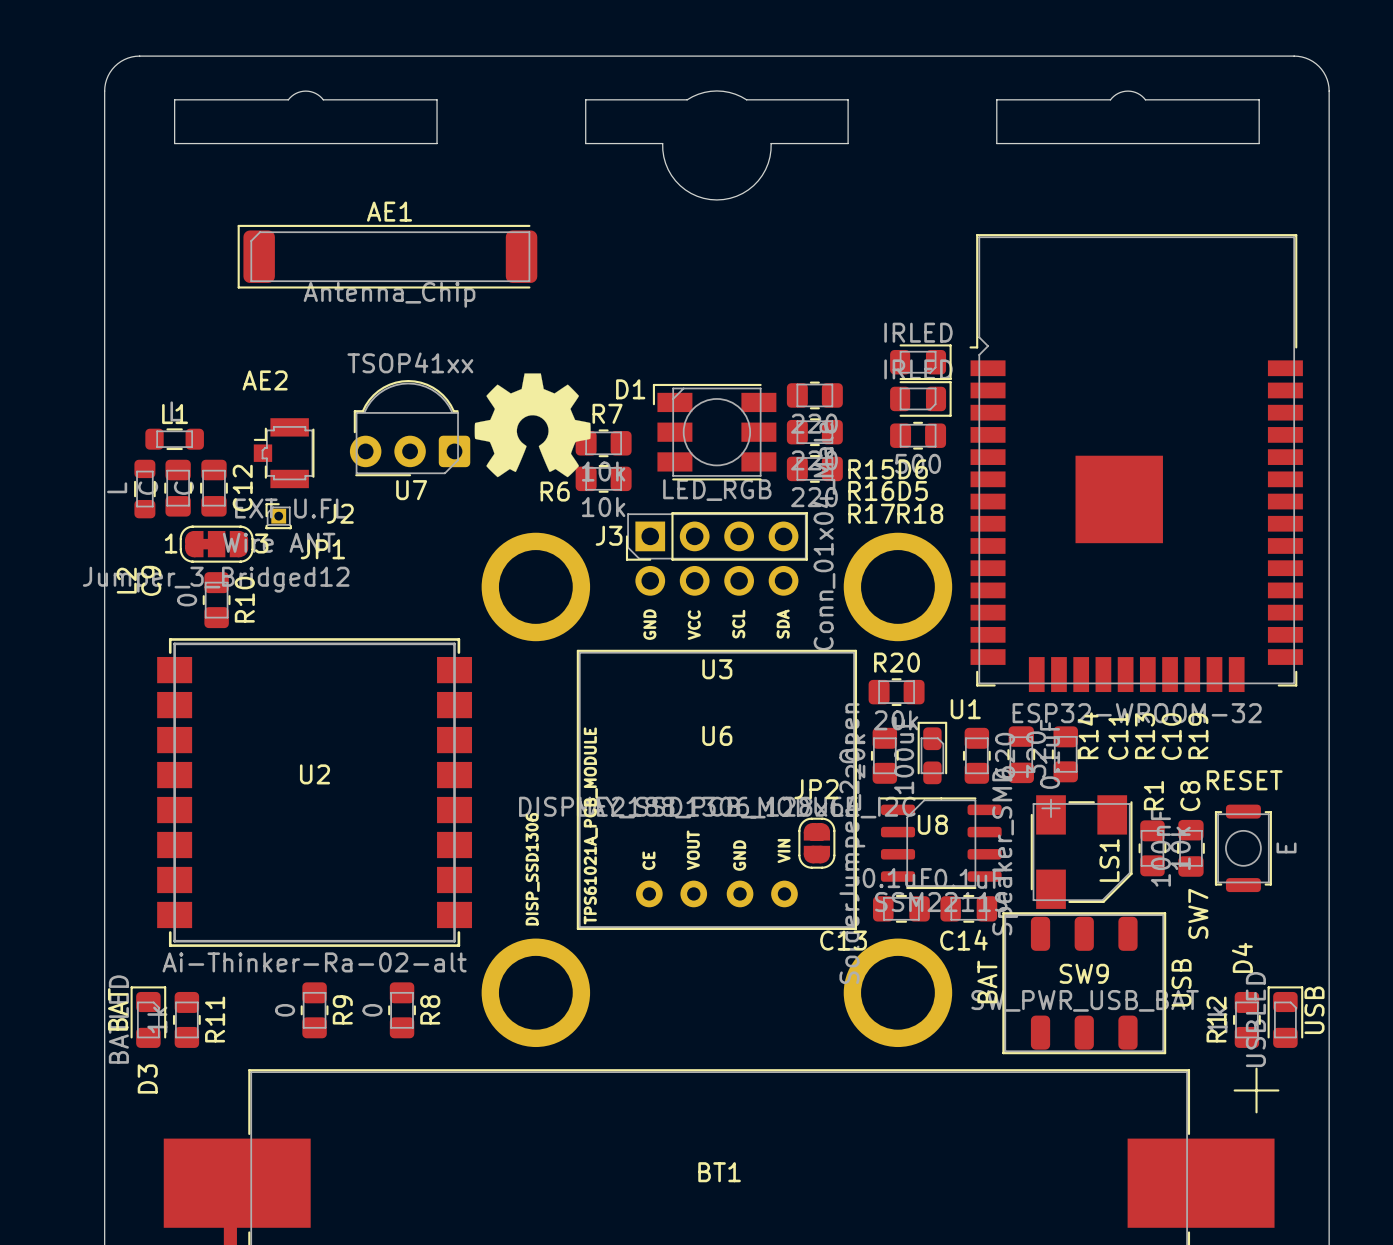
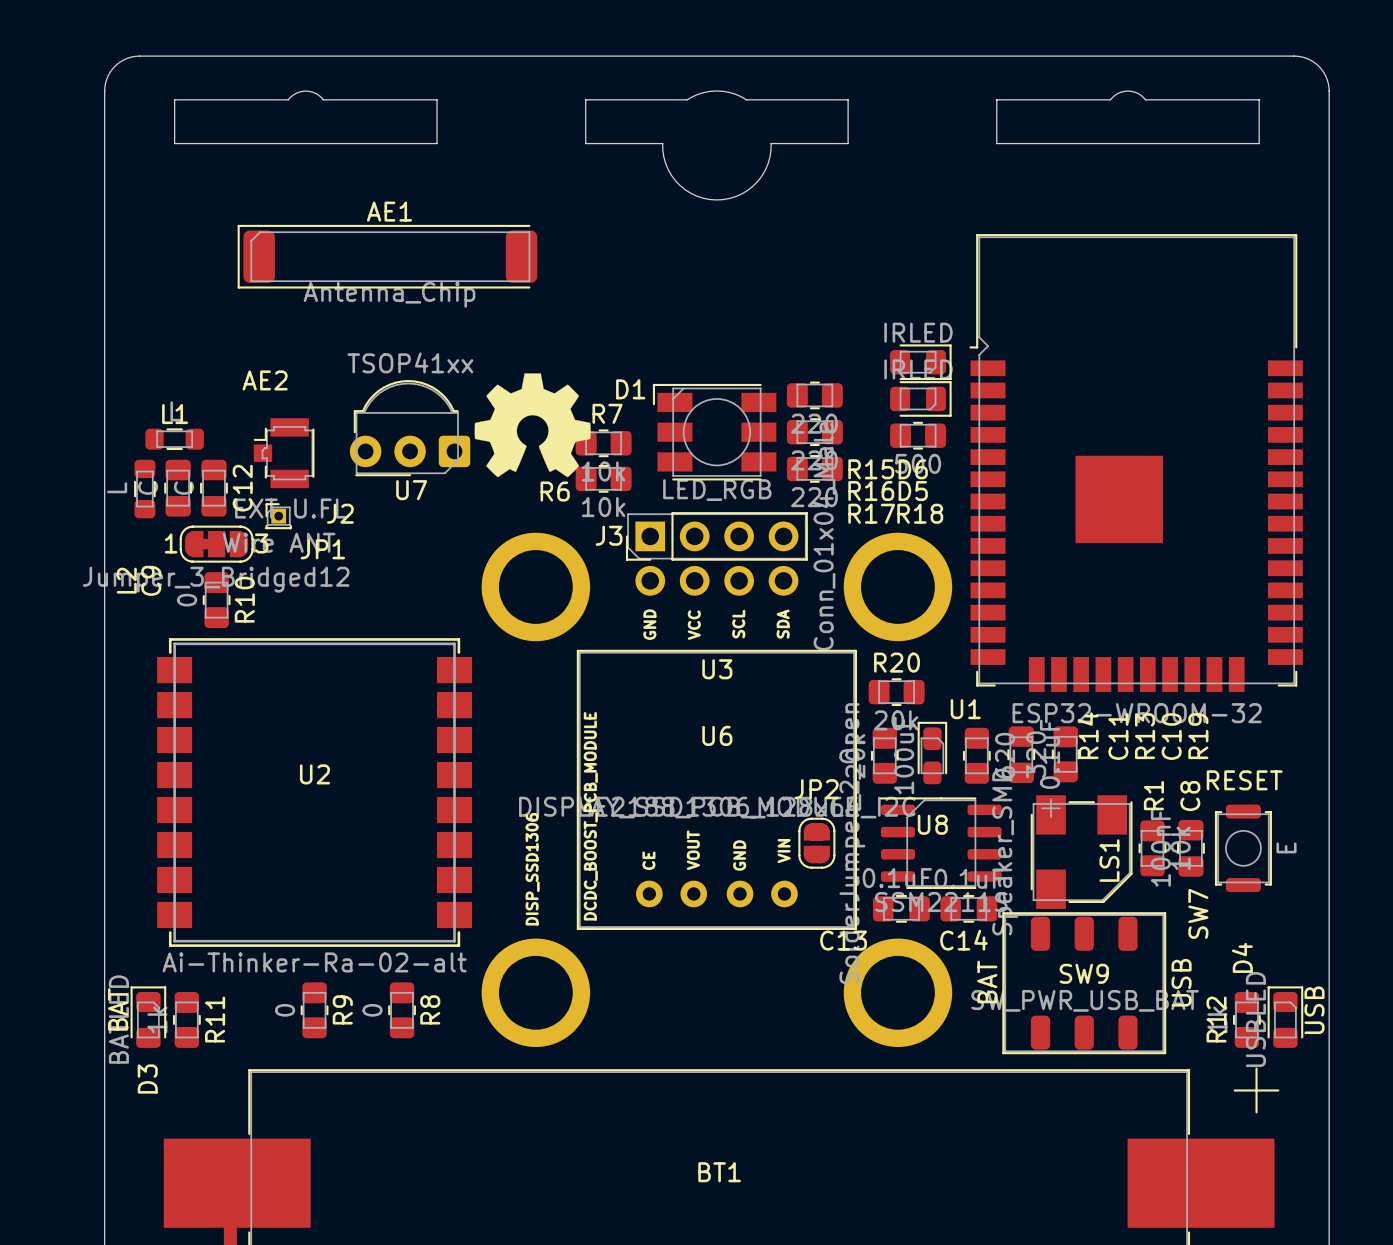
text: TPS61021A_PCB_MODULE (590, 825) -> DCDC_BOOST_PCB_MODULE (590, 816)

